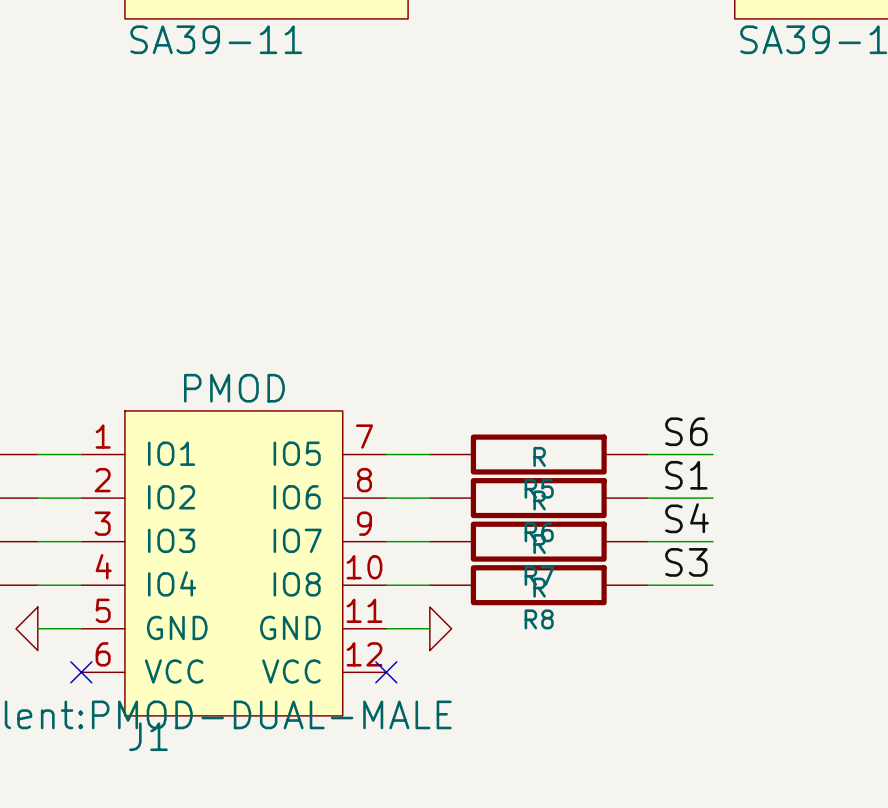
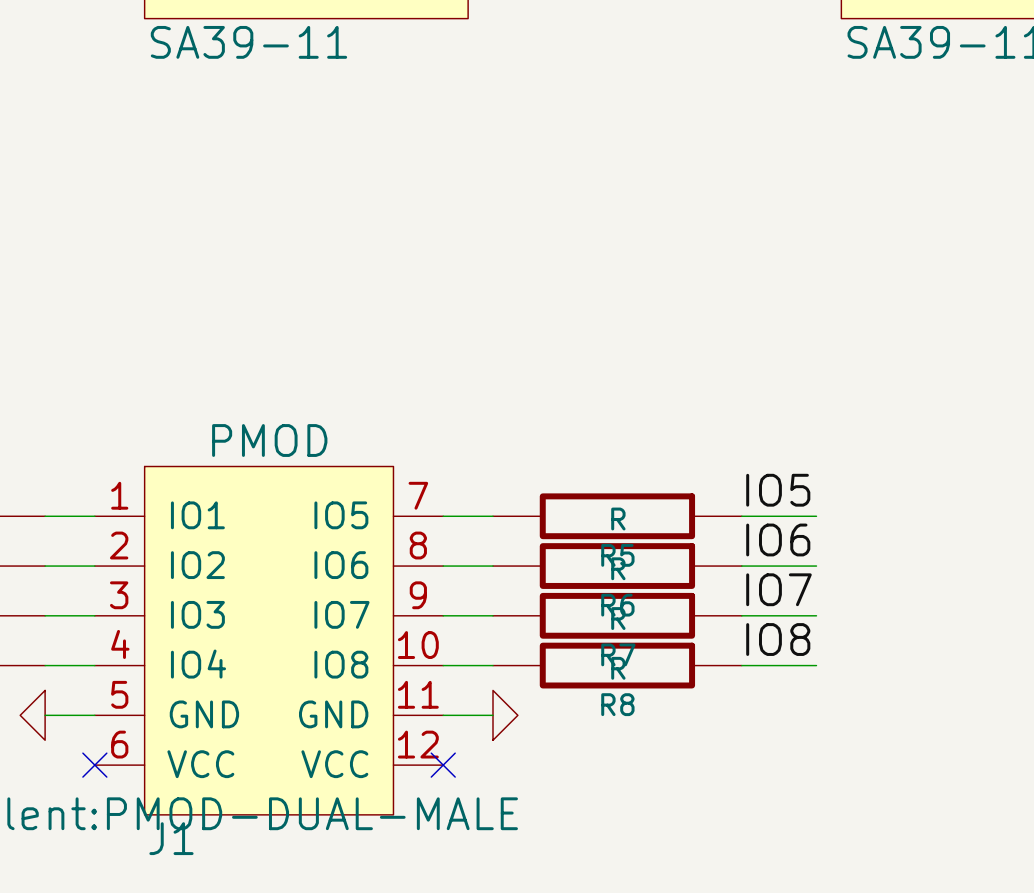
label: S6 (686, 431) -> IO5 (778, 490)
label: S1 (686, 475) -> IO6 (778, 539)
label: S4 (687, 518) -> IO7 (778, 589)
label: S3 (686, 562) -> IO8 (778, 639)

